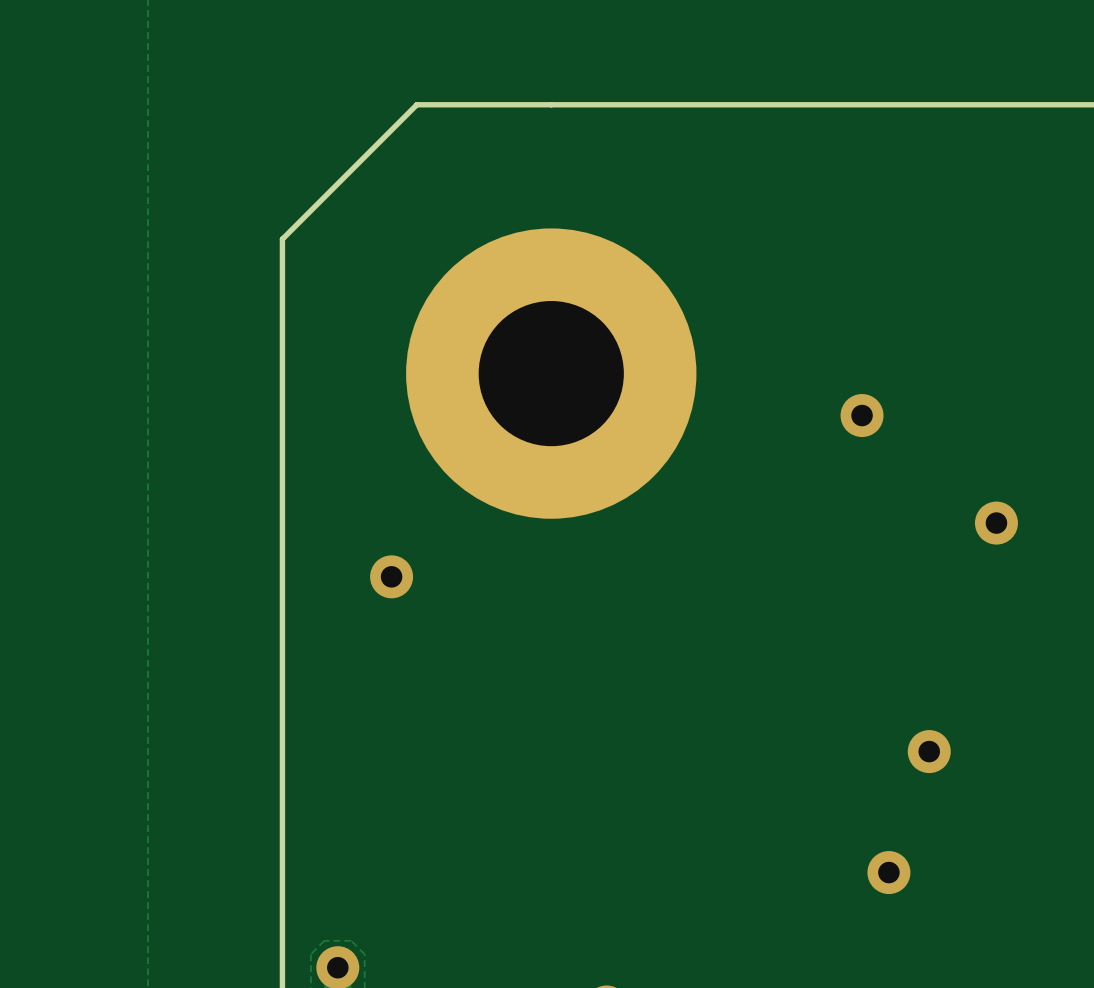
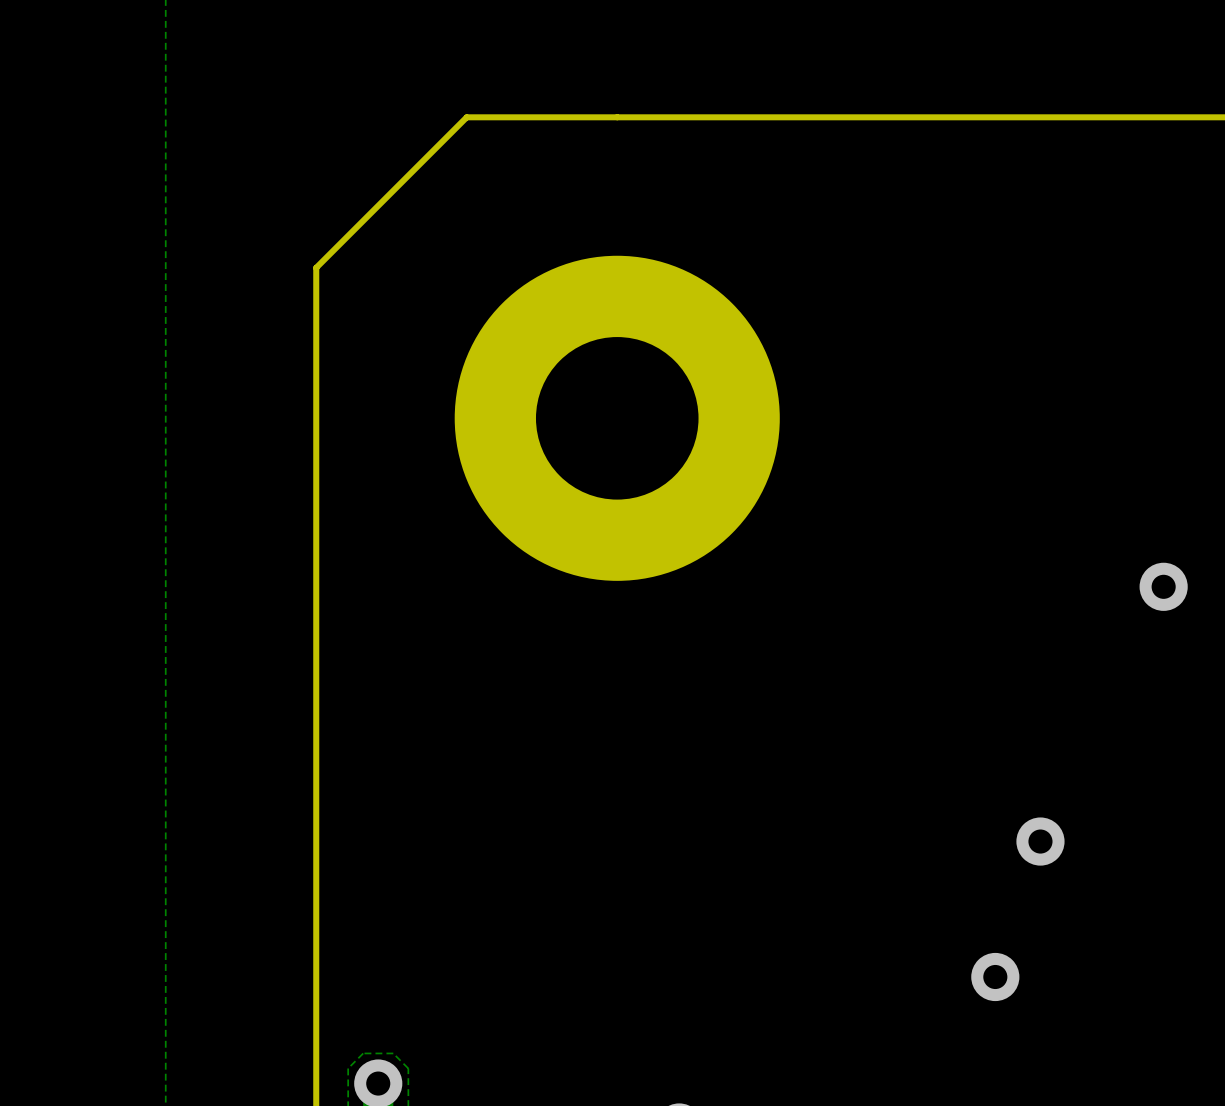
via: (862, 415) -> none
via position: (996, 523) -> (1163, 586)
via: (391, 576) -> none

